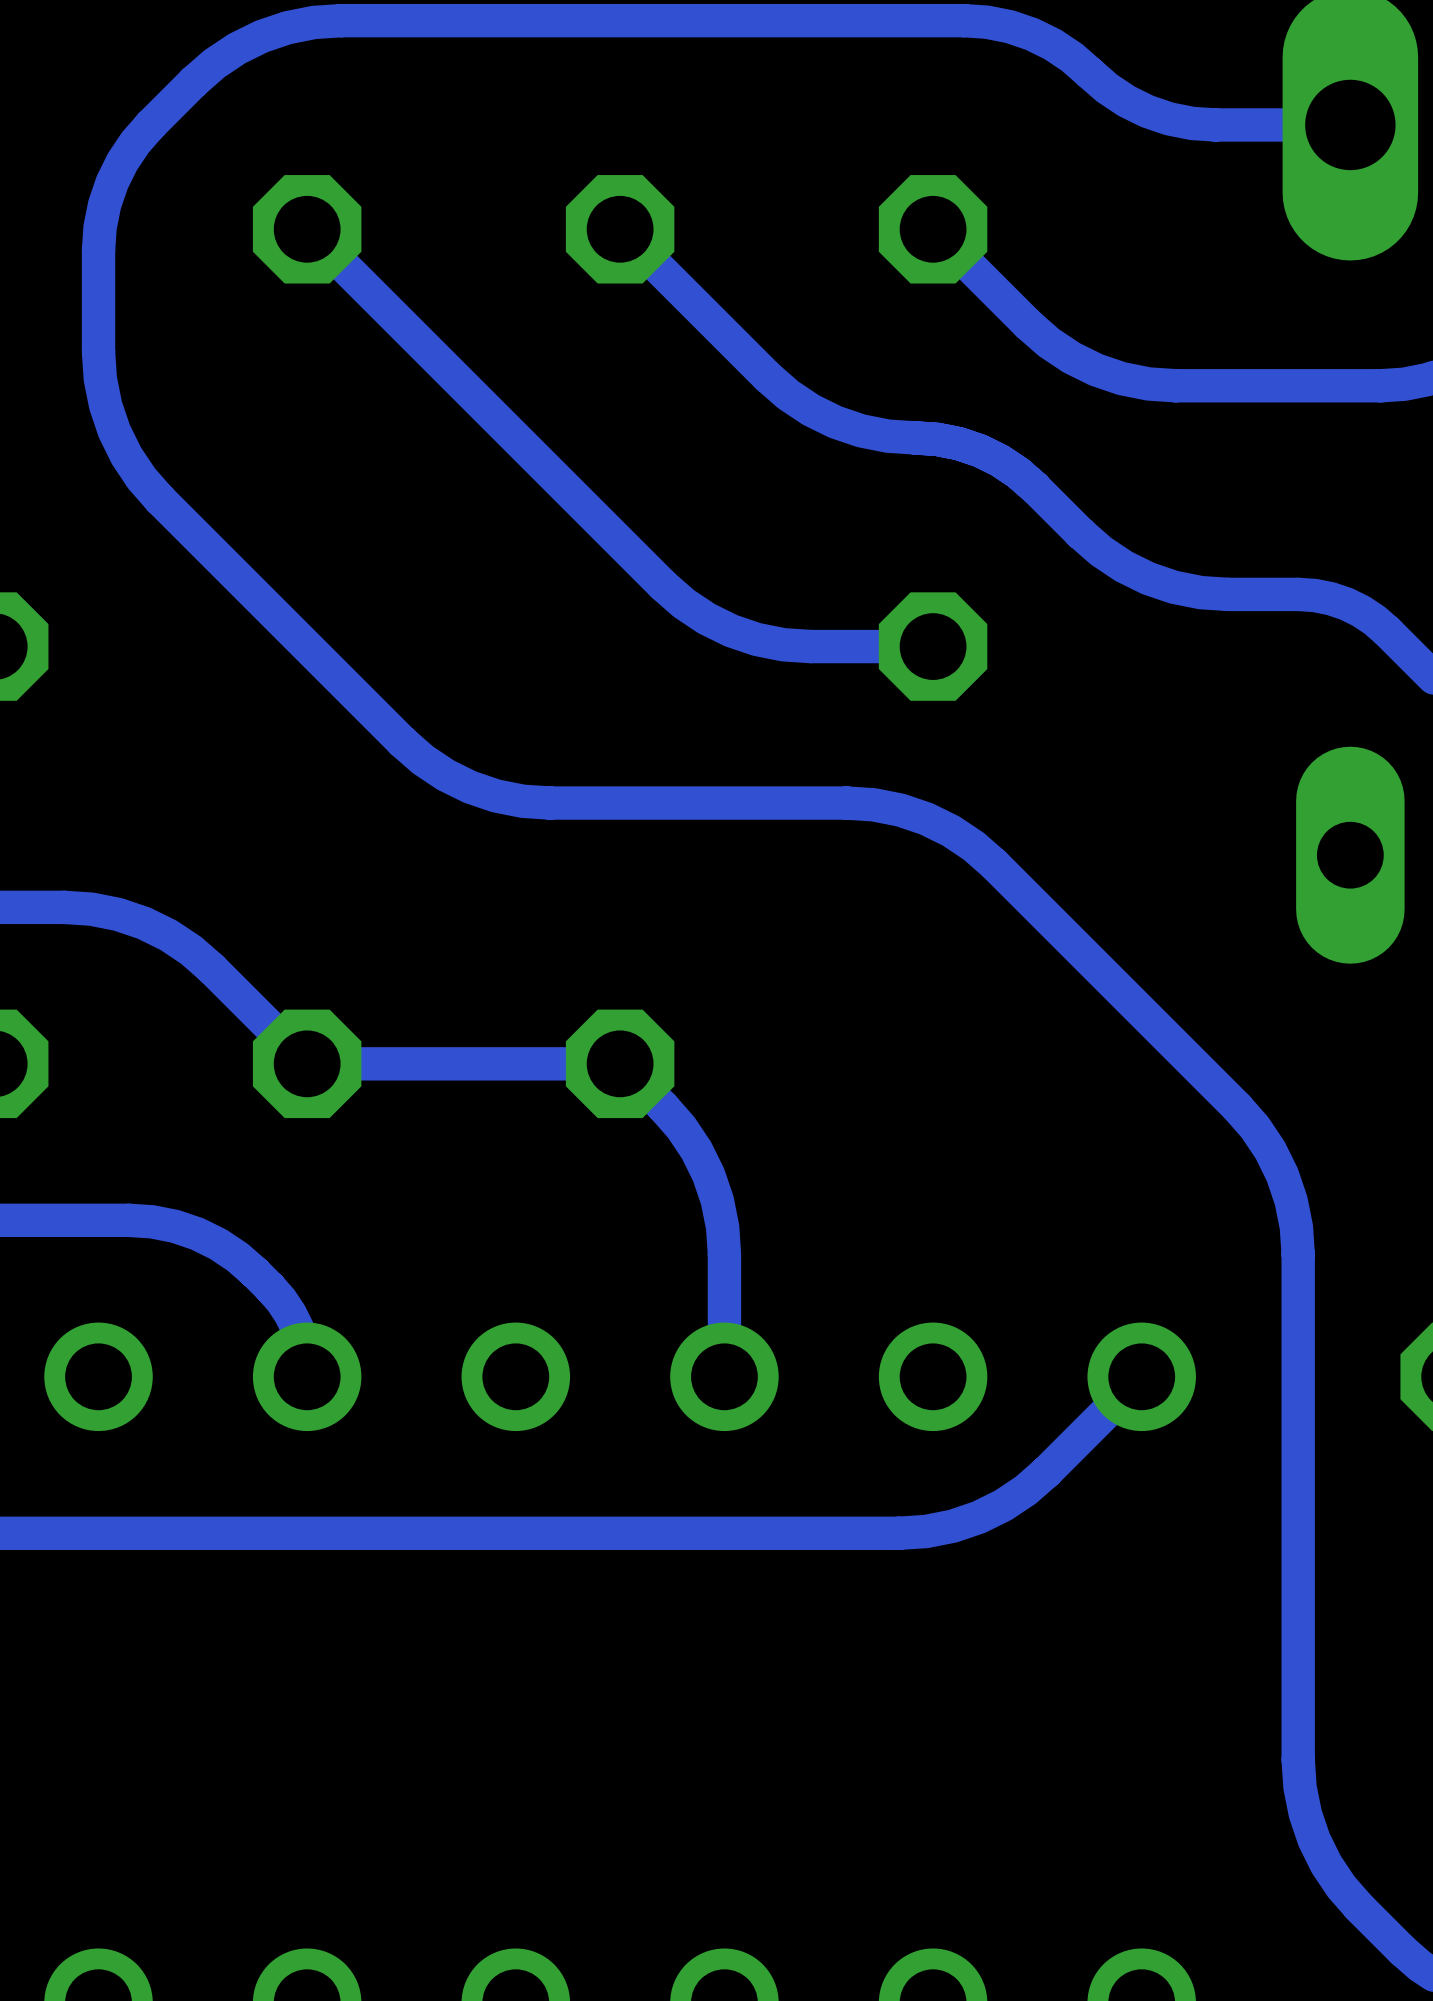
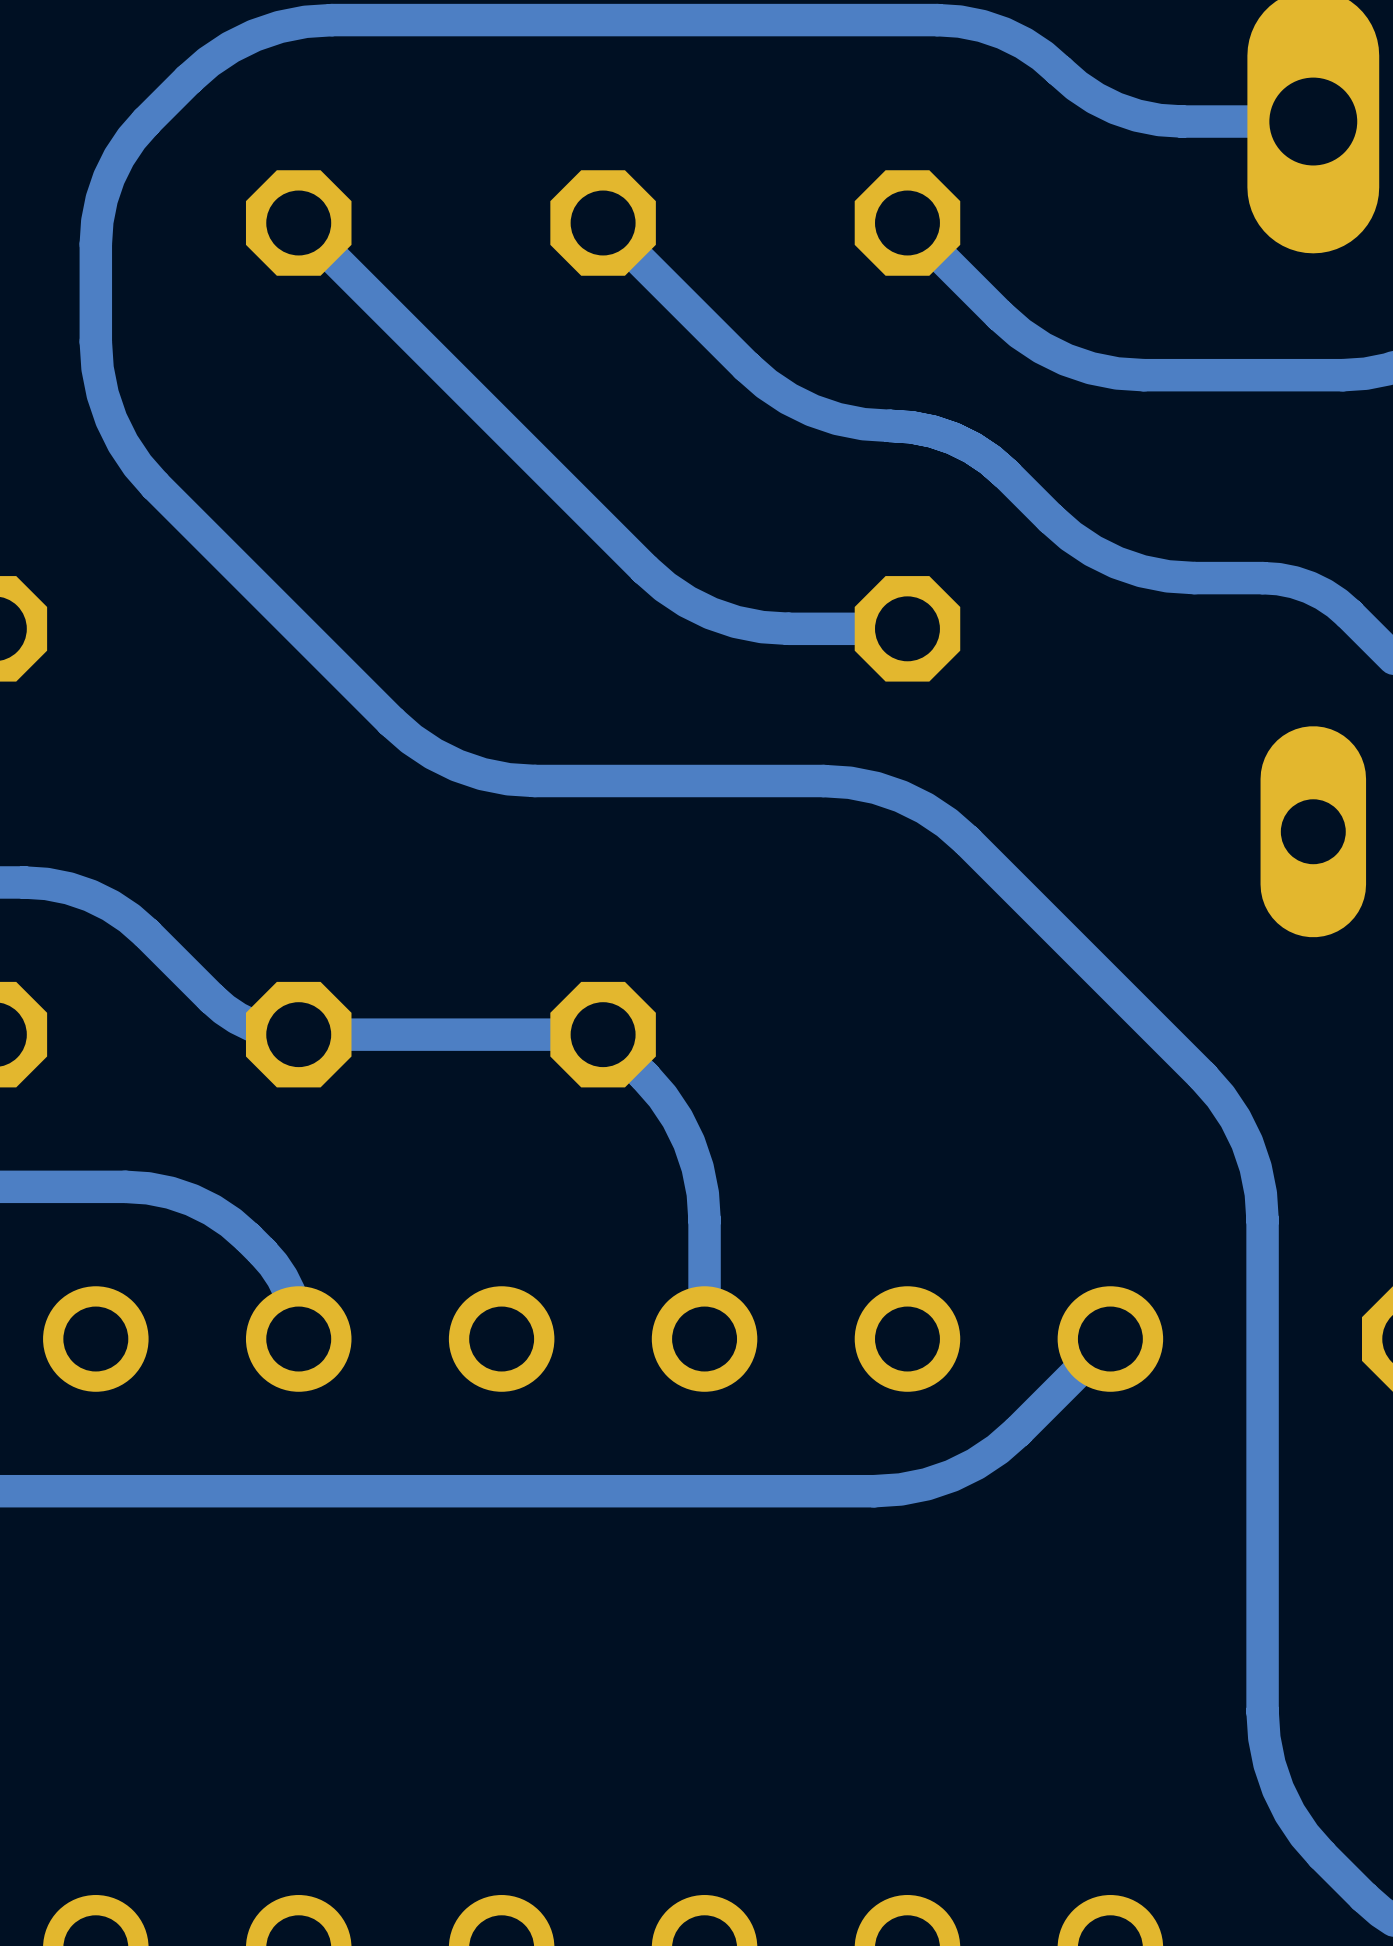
track: (24, 907) (91, 909) (118, 914) (144, 923) (168, 935) (191, 950) (211, 968) (307, 1063) -> (24, 882) (68, 888) (110, 905) (146, 933) (224, 1009) (251, 1025) (267, 1030) (298, 1034)

